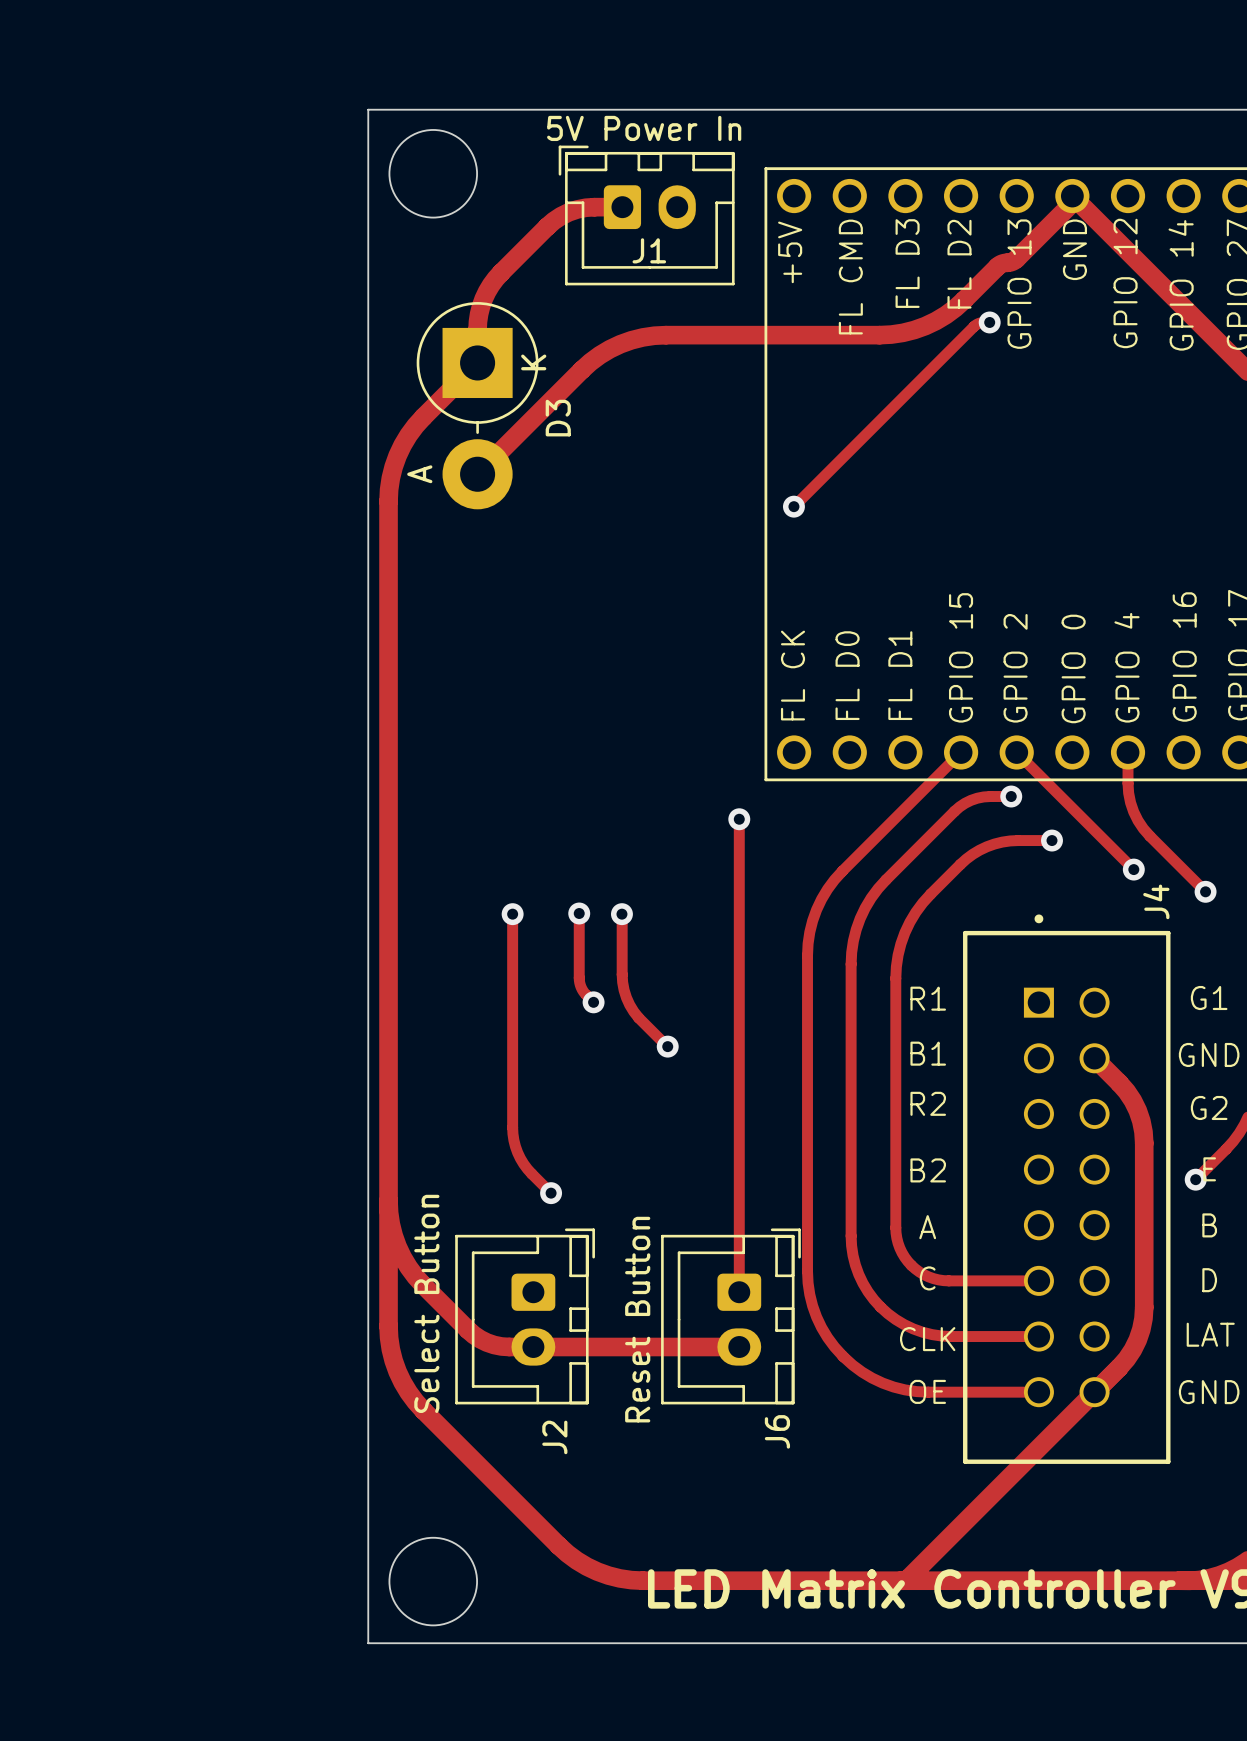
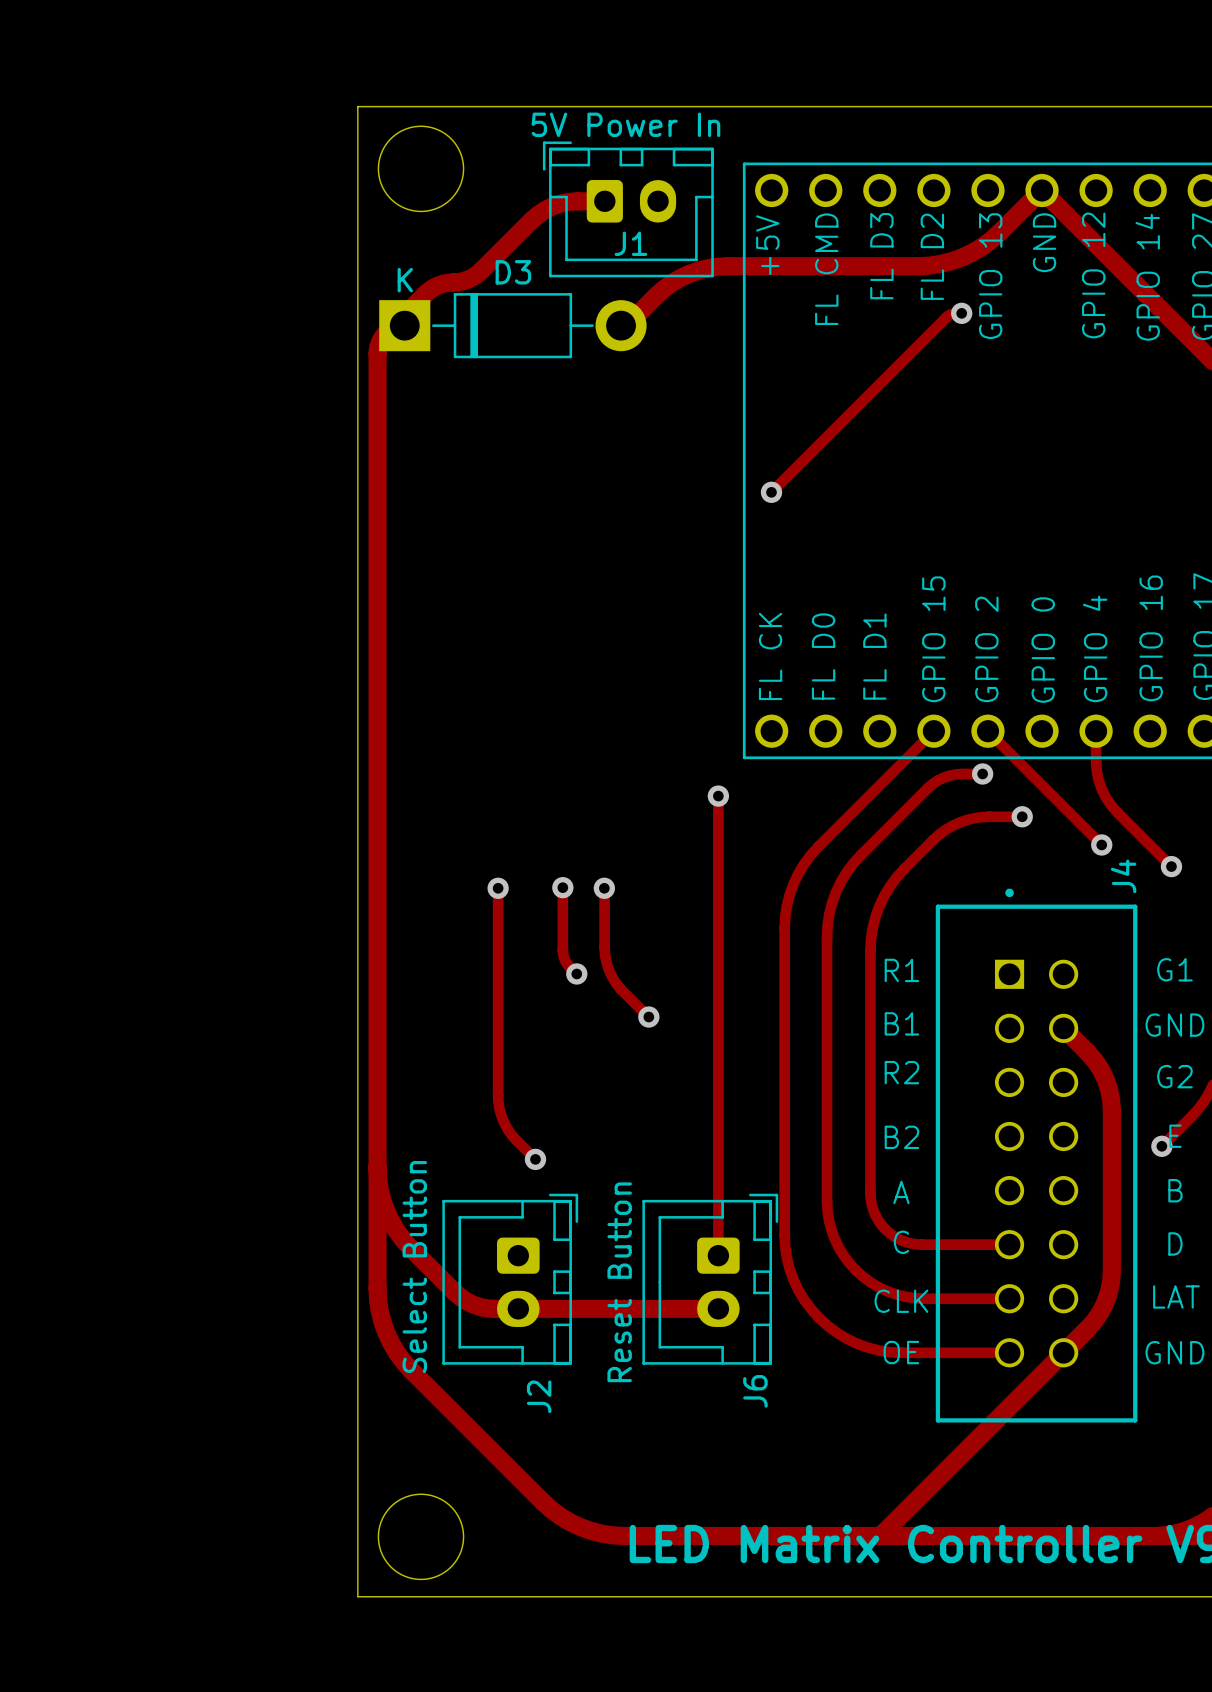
track: (1072, 203) (1015, 260) (998, 265) (963, 300) (945, 315) (914, 330) (879, 335) (666, 335) (642, 337) (620, 344) (599, 355) (581, 370) (477, 474) -> (1042, 197) (1032, 199) (982, 246) (951, 261) (917, 266) (727, 266) (708, 268) (689, 273) (671, 283) (628, 323) (610, 325)
track: (501, 272) (491, 285) (481, 306) (474, 350) (466, 369) (454, 386) (415, 425) (402, 445) (390, 478) (388, 501) -> (486, 265) (468, 279) (442, 284) (431, 289) (380, 340) (377, 353) (377, 487)
D3 footprint: [416, 302, 539, 510] -> [379, 293, 647, 359]
D3 name position: D3 (558, 418) -> D3 (513, 272)

